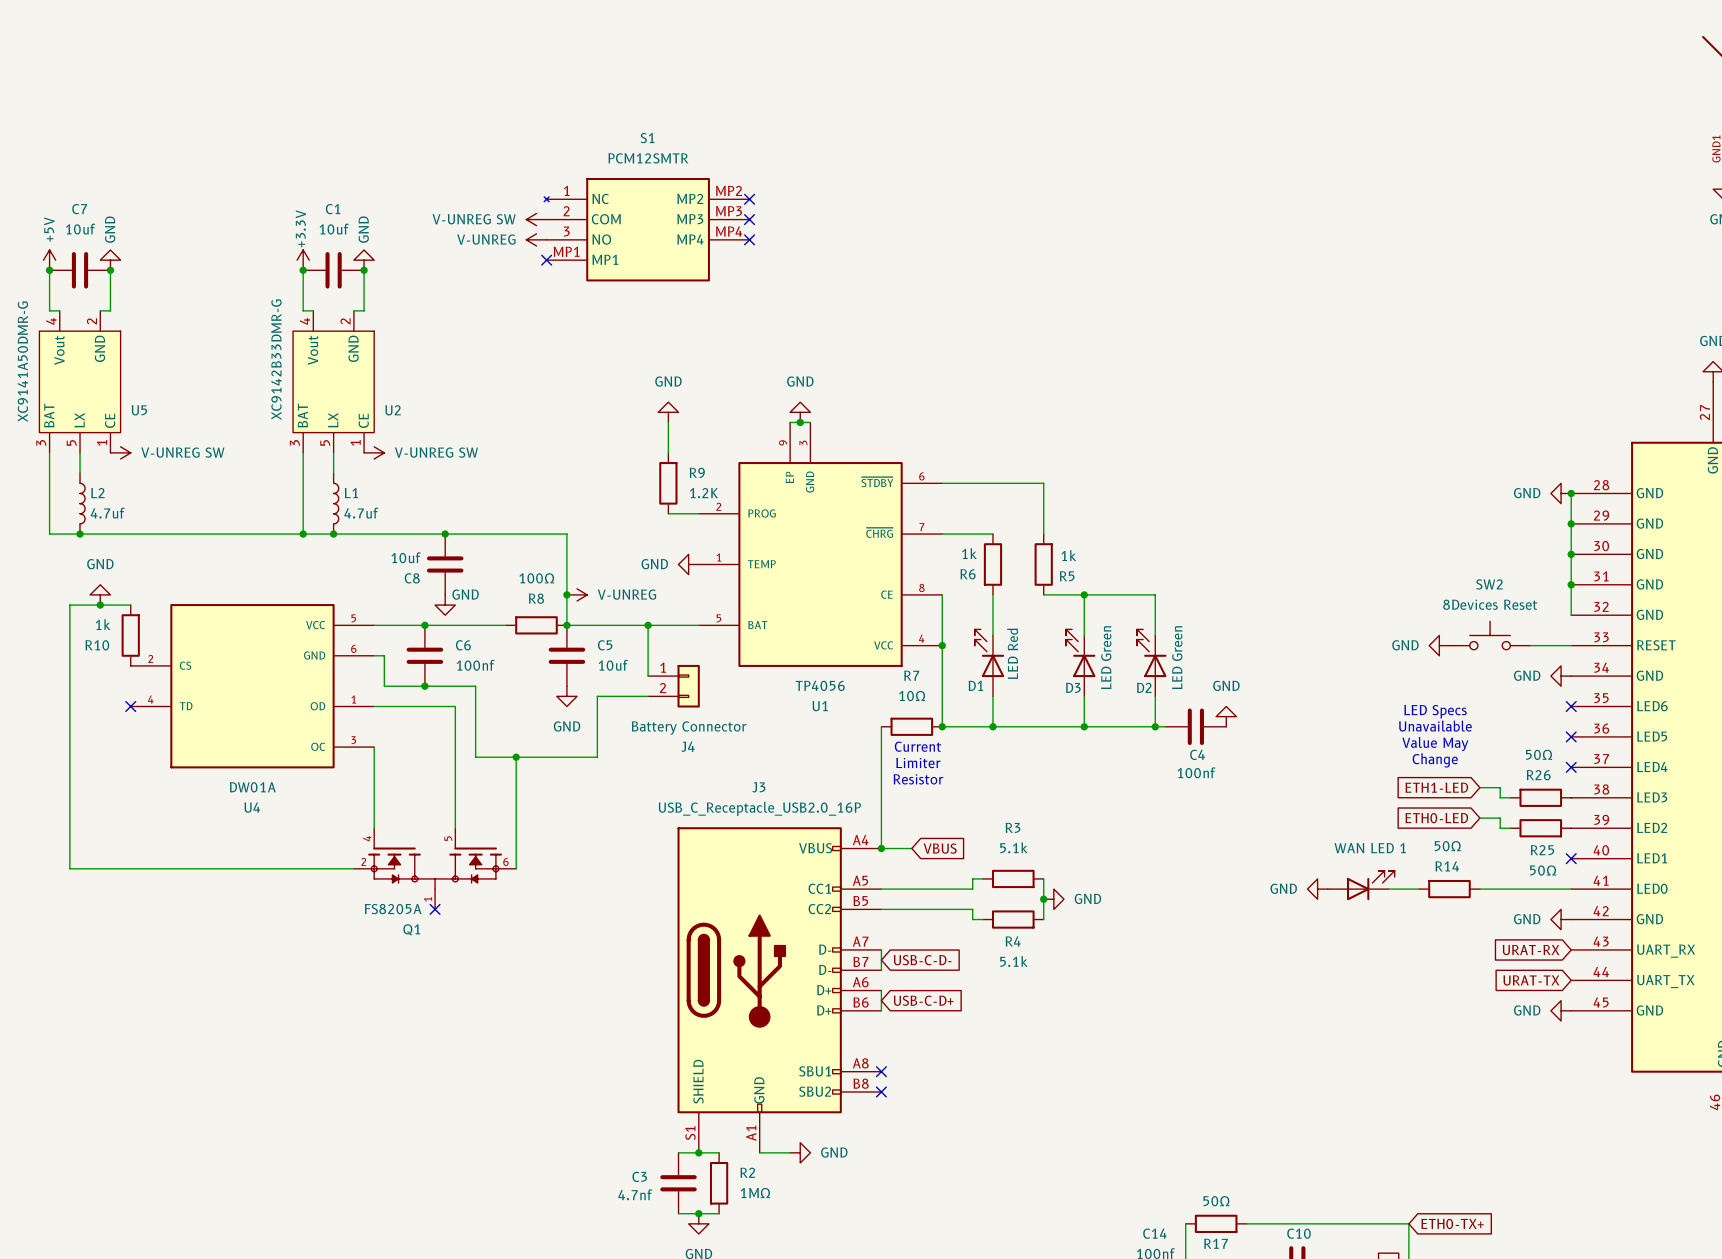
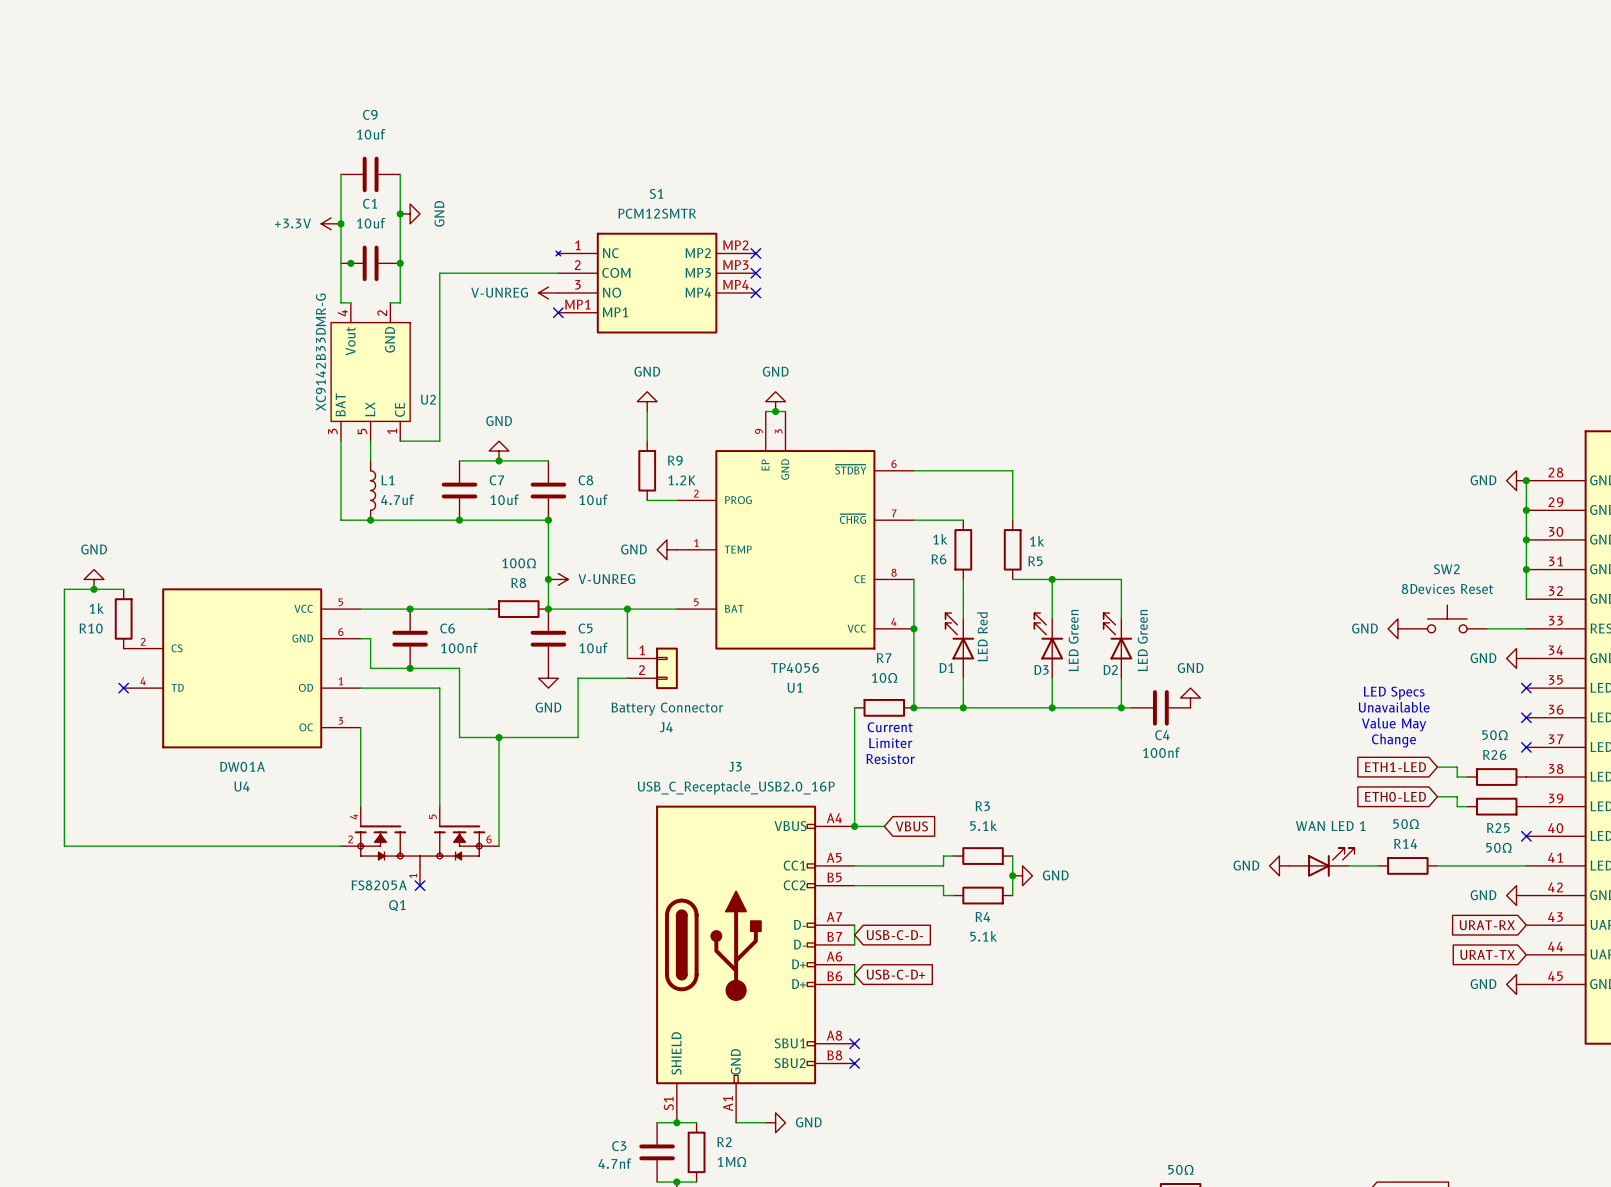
wire: none -> (340, 174) (340, 302)
C9: none -> 10uf (370, 174)
wire: none -> (400, 174) (400, 302) (390, 302)
no-connect mark: (749, 199) -> none
C7 name position: C7 (79, 209) -> C7 (496, 480)
junction: none -> (400, 213)
power symbol: V-UNREG SW (536, 219) -> none
no-connect mark: (749, 219) -> none
junction: none -> (340, 223)
S1 position: (646, 229) -> (655, 283)
power symbol position: V-UNREG (536, 239) -> V-UNREG (548, 292)
no-connect mark: (749, 239) -> none
power symbol: +5V (49, 260) -> none
power symbol: GND (110, 260) -> none
power symbol rotation: 0° (303, 260) -> 90° counterclockwise (331, 223)
power symbol position: +3.3V (303, 260) -> +3.3V (331, 223)
power symbol rotation: 0° (364, 260) -> 90° clockwise (410, 213)
power symbol position: GND (364, 260) -> GND (410, 213)
no-connect mark: (546, 260) -> none
no-connect mark: none -> (755, 253)
wire: (49, 270) (49, 310) (59, 310) -> none
junction: (49, 270) -> none
C7 rotation: 0° (80, 270) -> 90° clockwise (459, 490)
C7 position: (80, 270) -> (459, 490)
wire: (110, 270) (110, 310) (100, 310) -> none
junction: (110, 270) -> none
wire: (303, 270) (303, 310) (313, 310) -> none
junction: (303, 270) -> none
C1 position: (333, 270) -> (370, 263)
wire: (364, 270) (364, 310) -> none
junction: none -> (400, 263)
wire: none -> (558, 273) (439, 273) (439, 441) (400, 441)
no-connect mark: none -> (755, 273)
no-connect mark: none -> (755, 292)
no-connect mark: none -> (558, 312)
U2 value position: XC9142B33DMR-G (276, 359) -> XC9142B33DMR-G (320, 352)
U5: XC9141A50DMR-G (80, 381) -> none
U2 position: (333, 381) -> (370, 372)
wire: (49, 452) (49, 534) (353, 534) -> (340, 441) (340, 520)
wire: (80, 452) (80, 473) -> none
power symbol: V-UNREG SW (120, 452) -> none
wire: (303, 452) (303, 534) -> none
wire: (333, 452) (333, 473) -> (370, 441) (370, 460)
power symbol: V-UNREG SW (374, 452) -> none
power symbol: none -> GND (499, 451)
wire: none -> (459, 460) (548, 460)
junction: none -> (499, 460)
L2: 4.7uf (82, 503) -> none
L1 position: (336, 503) -> (373, 490)
junction: (80, 534) -> none
junction: (303, 534) -> none
junction: (333, 534) -> none
junction: none -> (370, 520)
junction: (445, 534) -> none
junction: none -> (459, 520)
junction: none -> (548, 520)
C8 value position: 10uf (406, 557) -> 10uf (593, 499)
C8 position: (445, 564) -> (548, 490)
C8 name position: C8 (412, 578) -> C8 (585, 480)
power symbol: GND (445, 605) -> none

